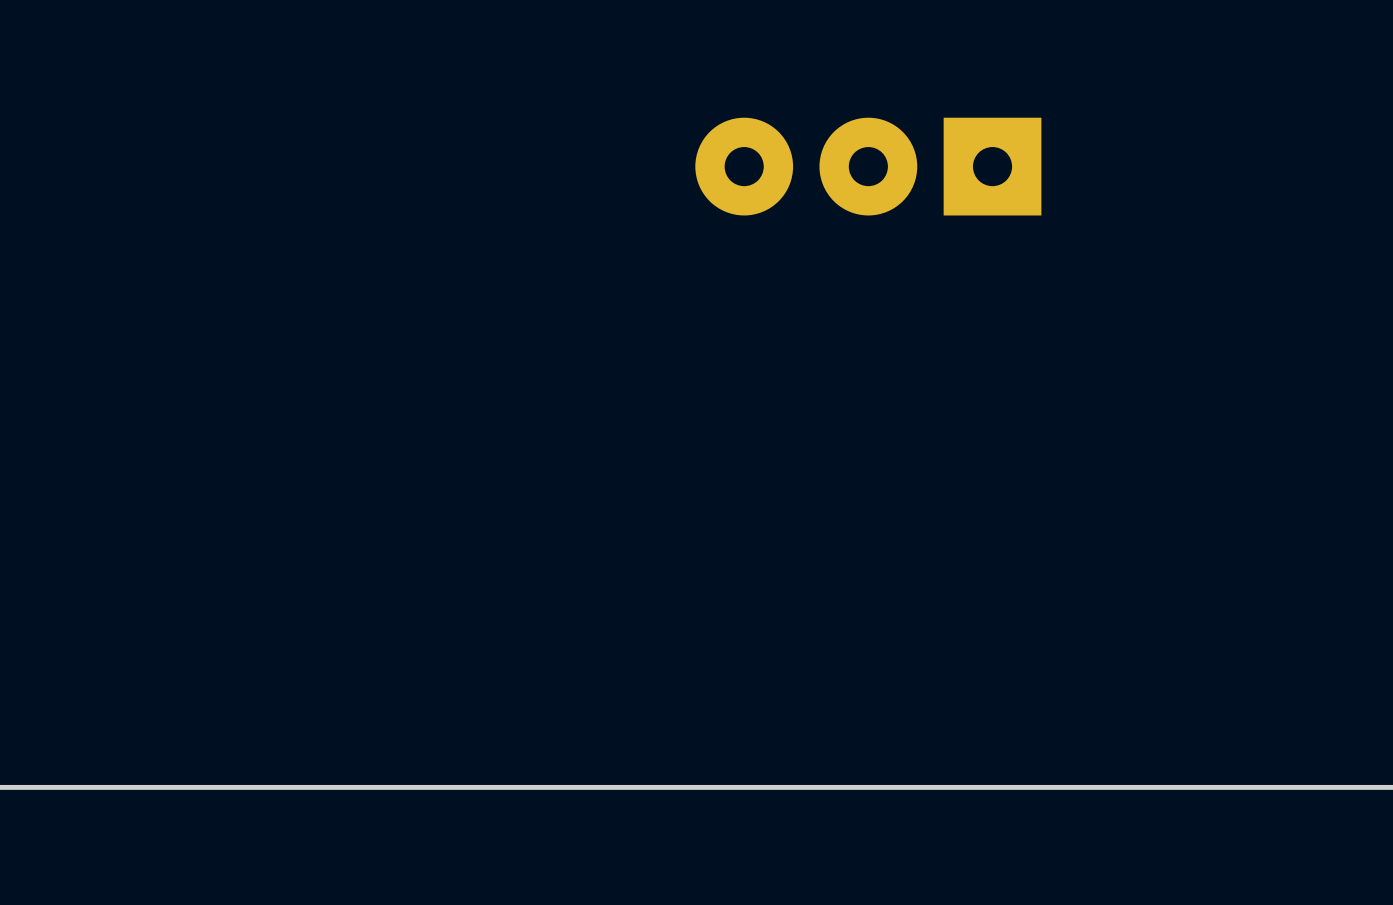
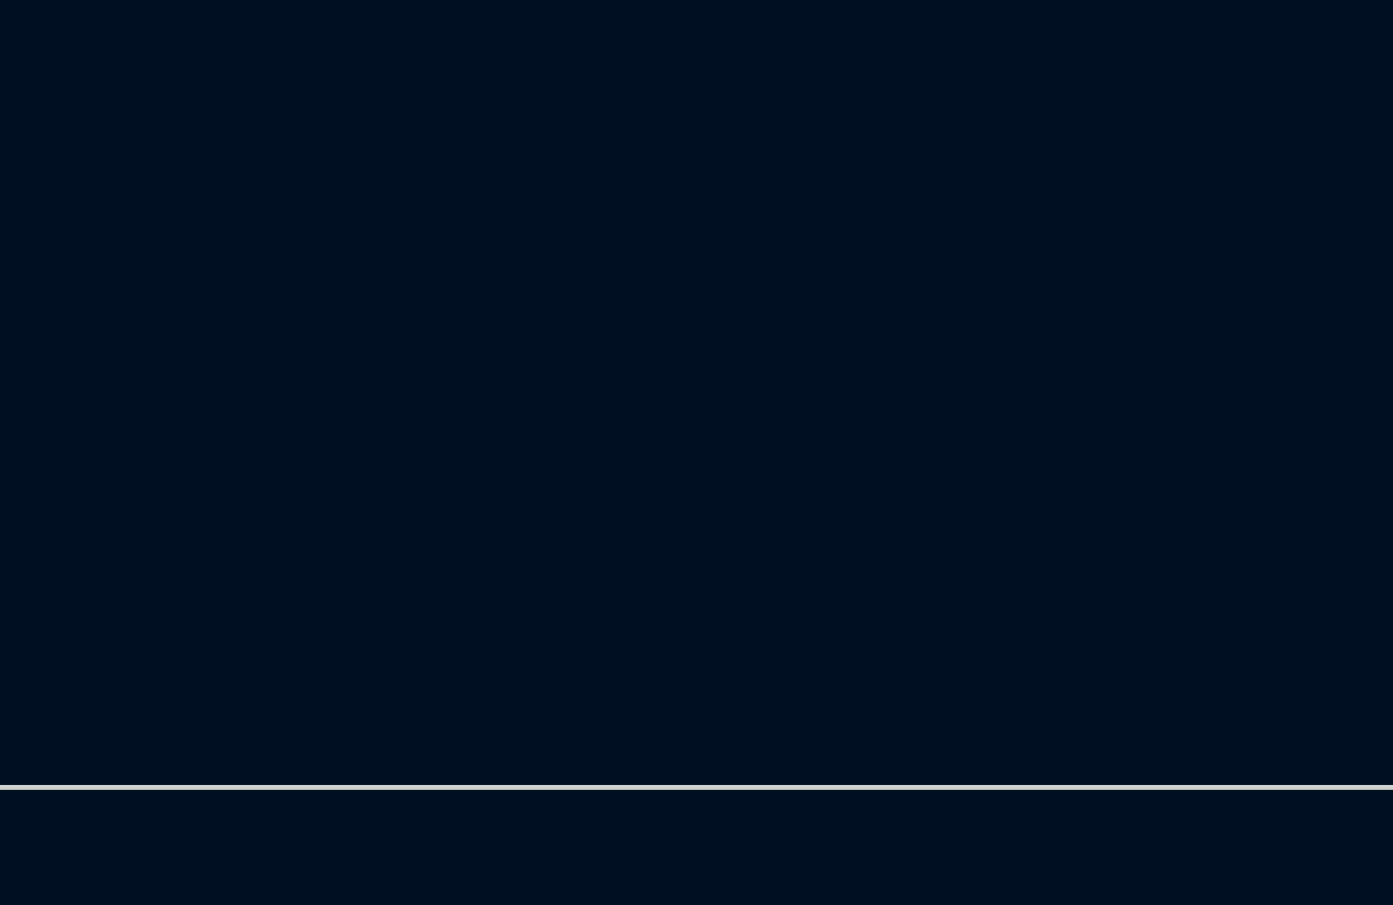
part: (868, 166) -> none

